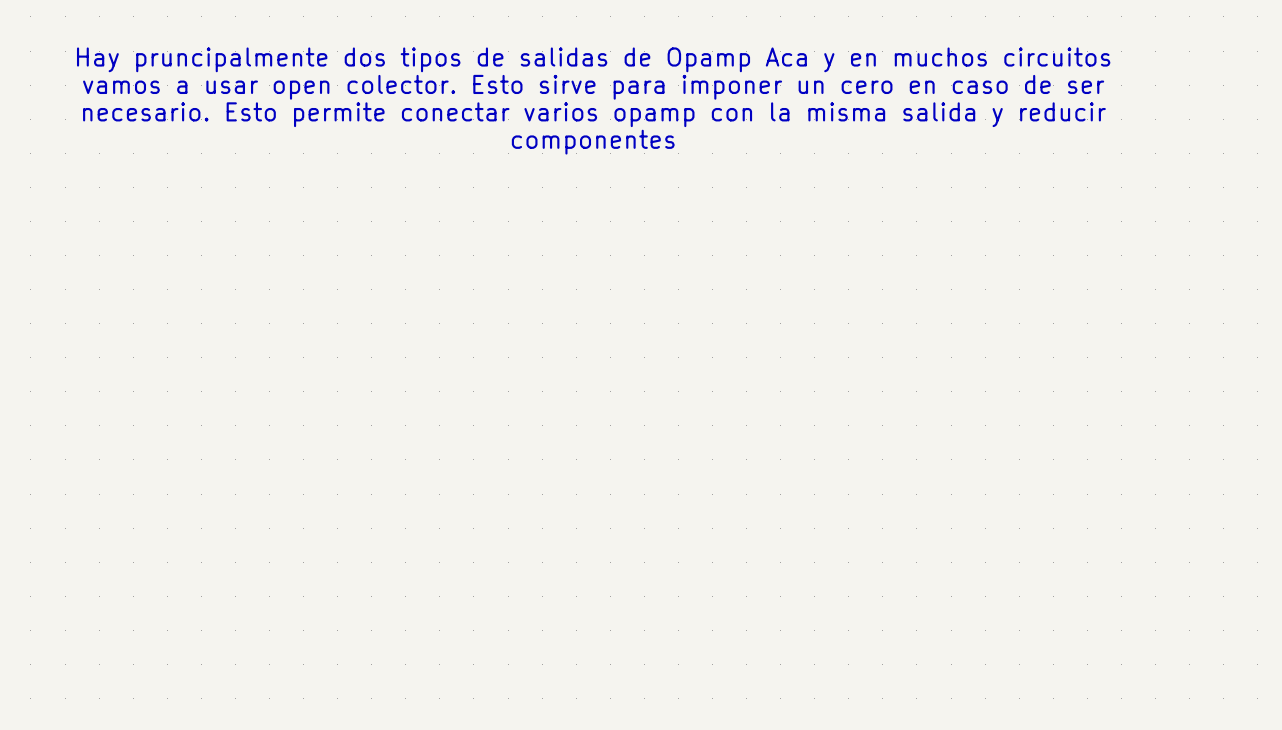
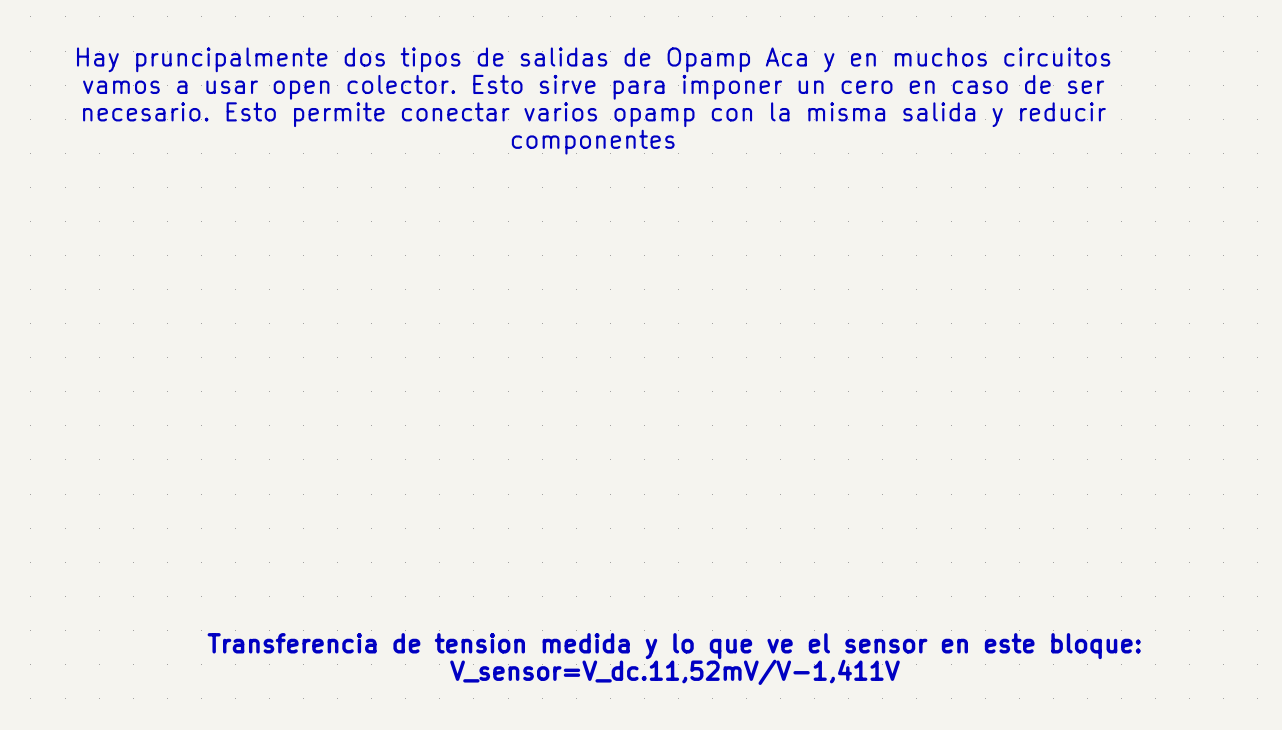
text: none -> Transferencia de tension medida y lo que ve el sensor en este bloque: (674, 646)
text: none -> V_sensor=V_dc.11,52mV/V-1,411V (675, 672)

